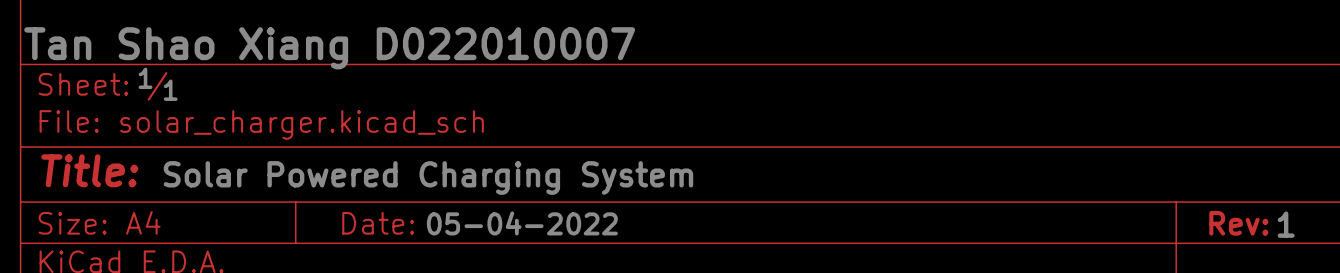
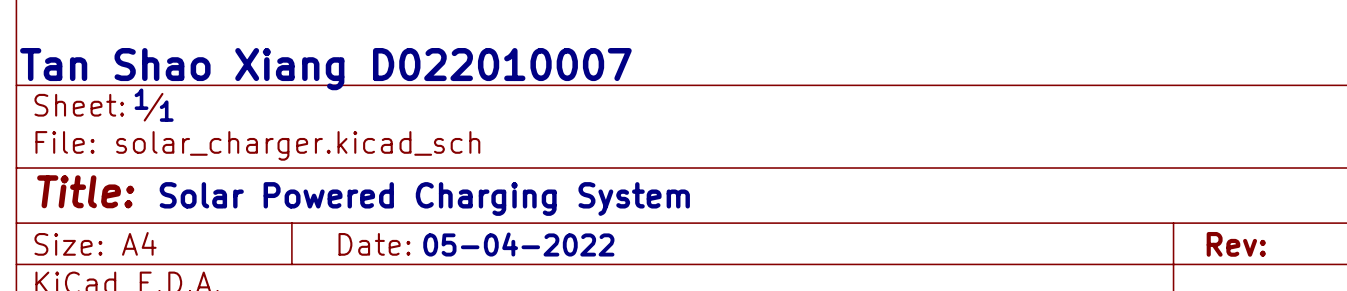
text: 1 (1286, 224) -> none

